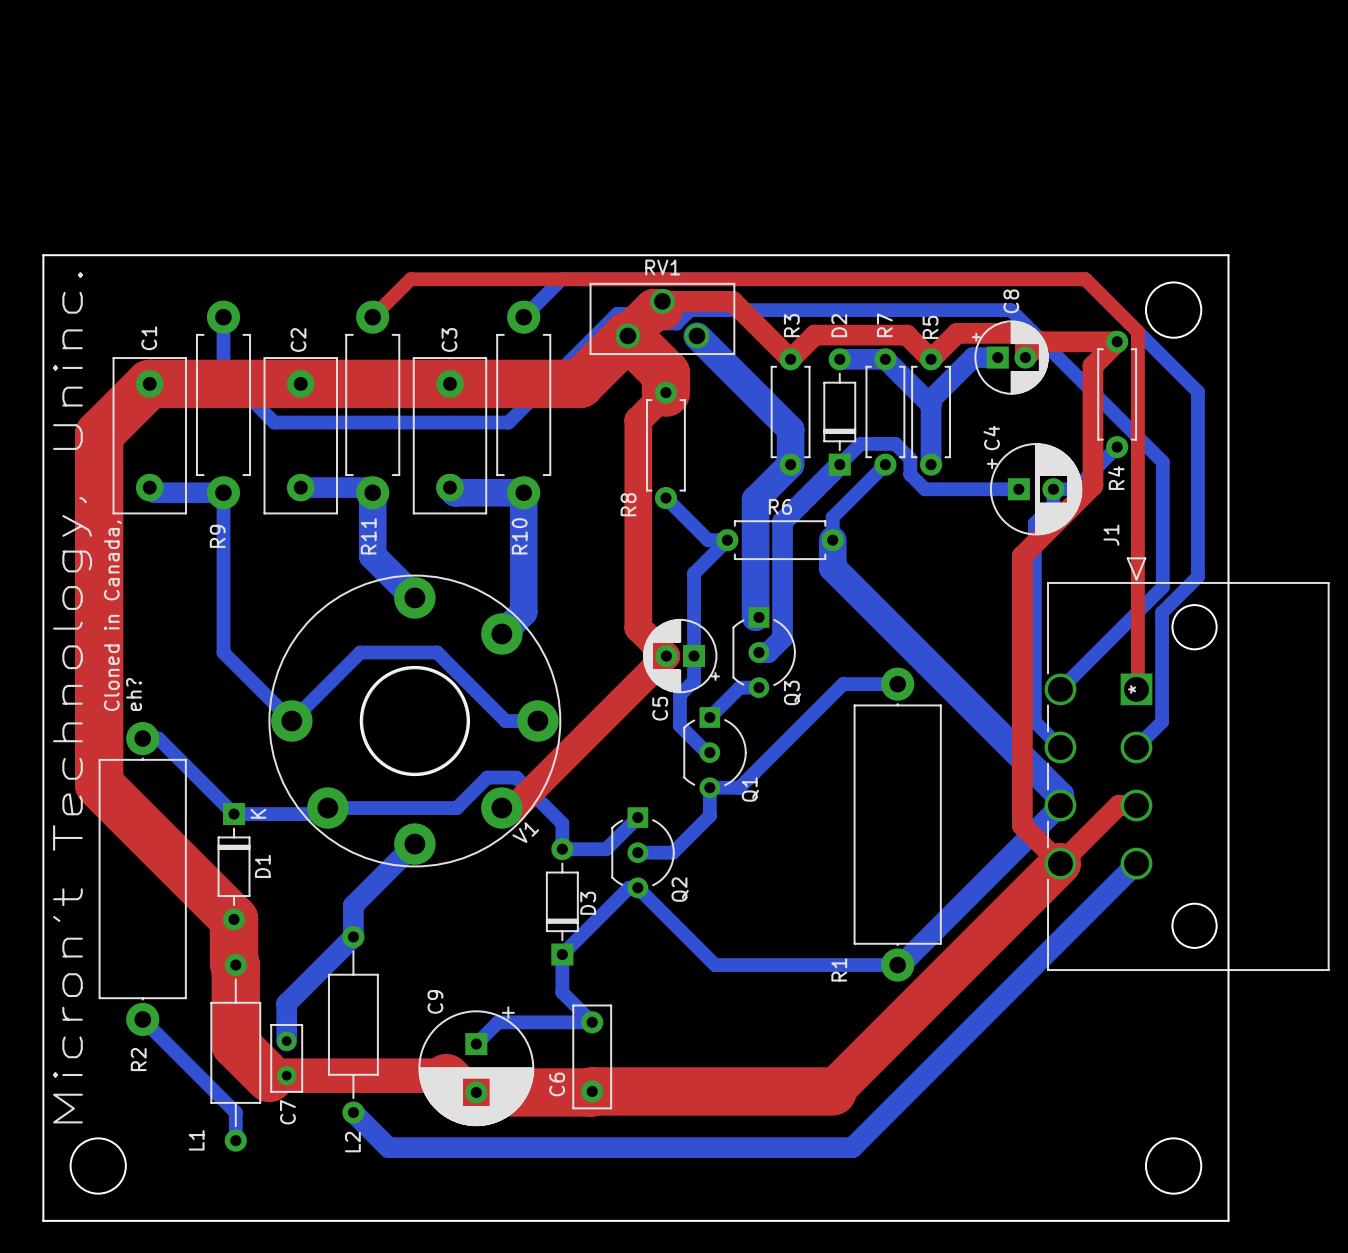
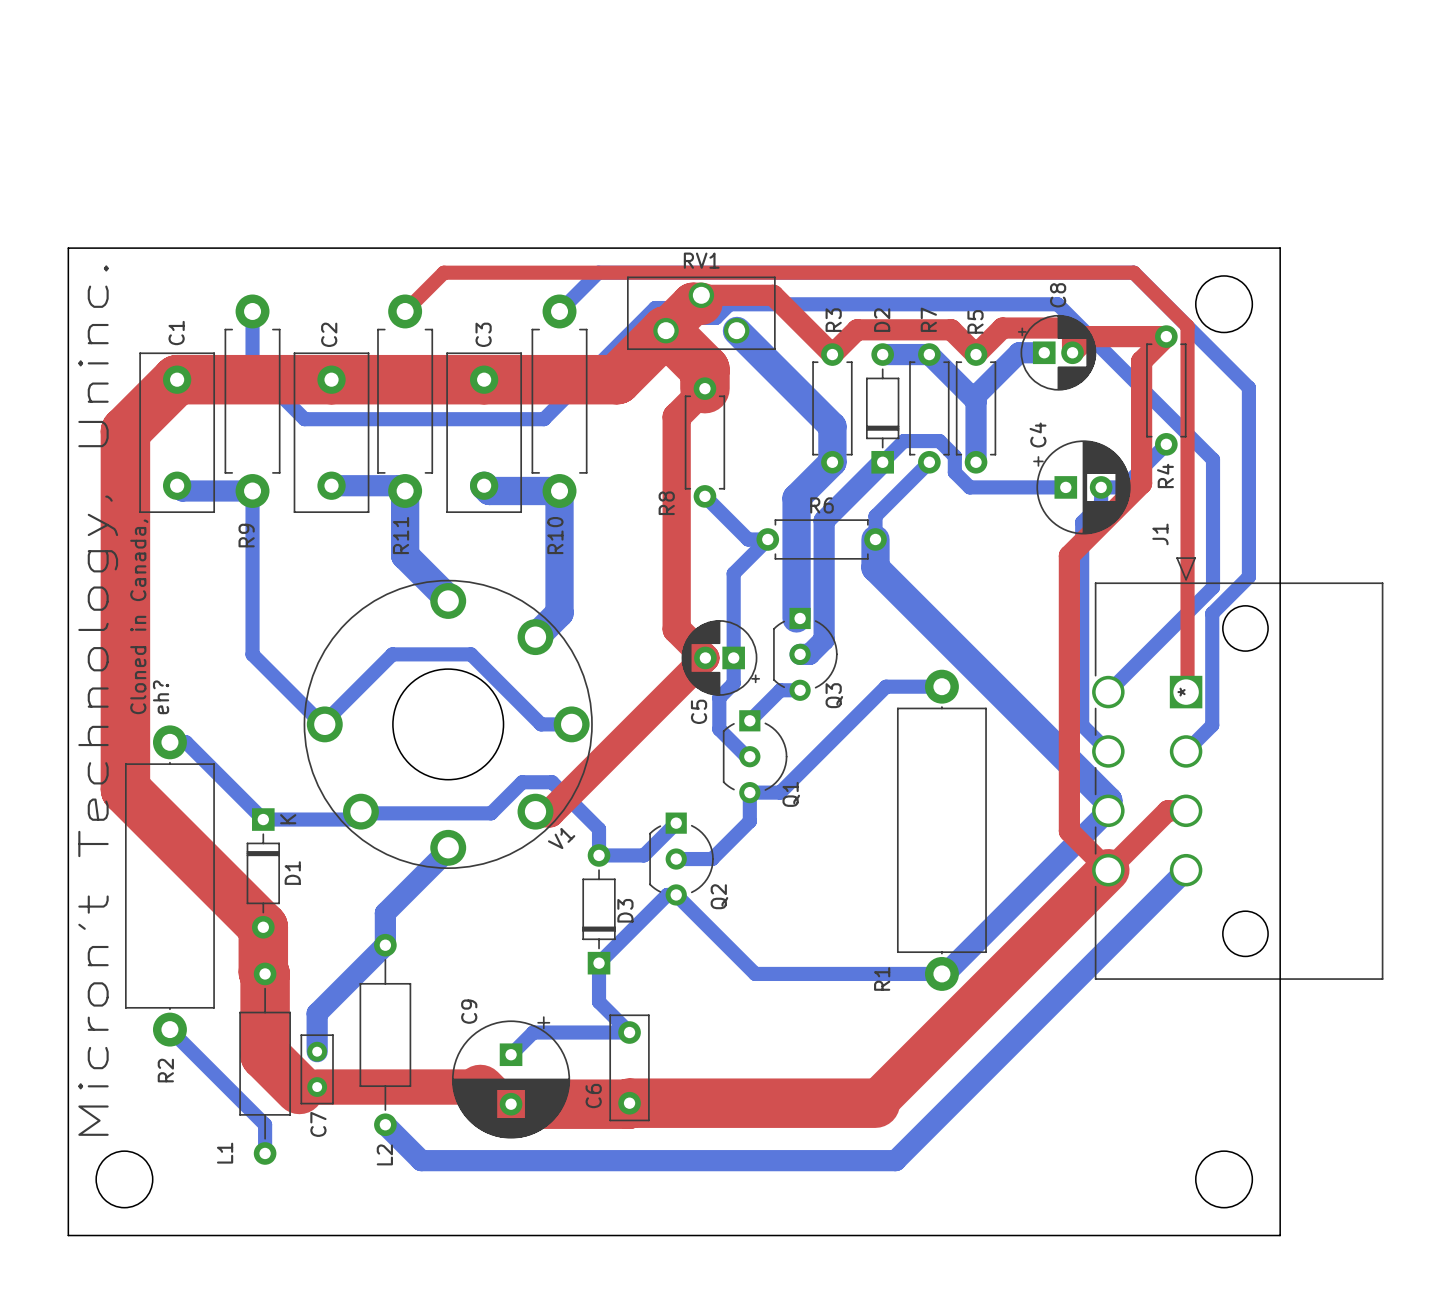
V1 footprint: [268, 574, 562, 868] -> [303, 579, 593, 870]

